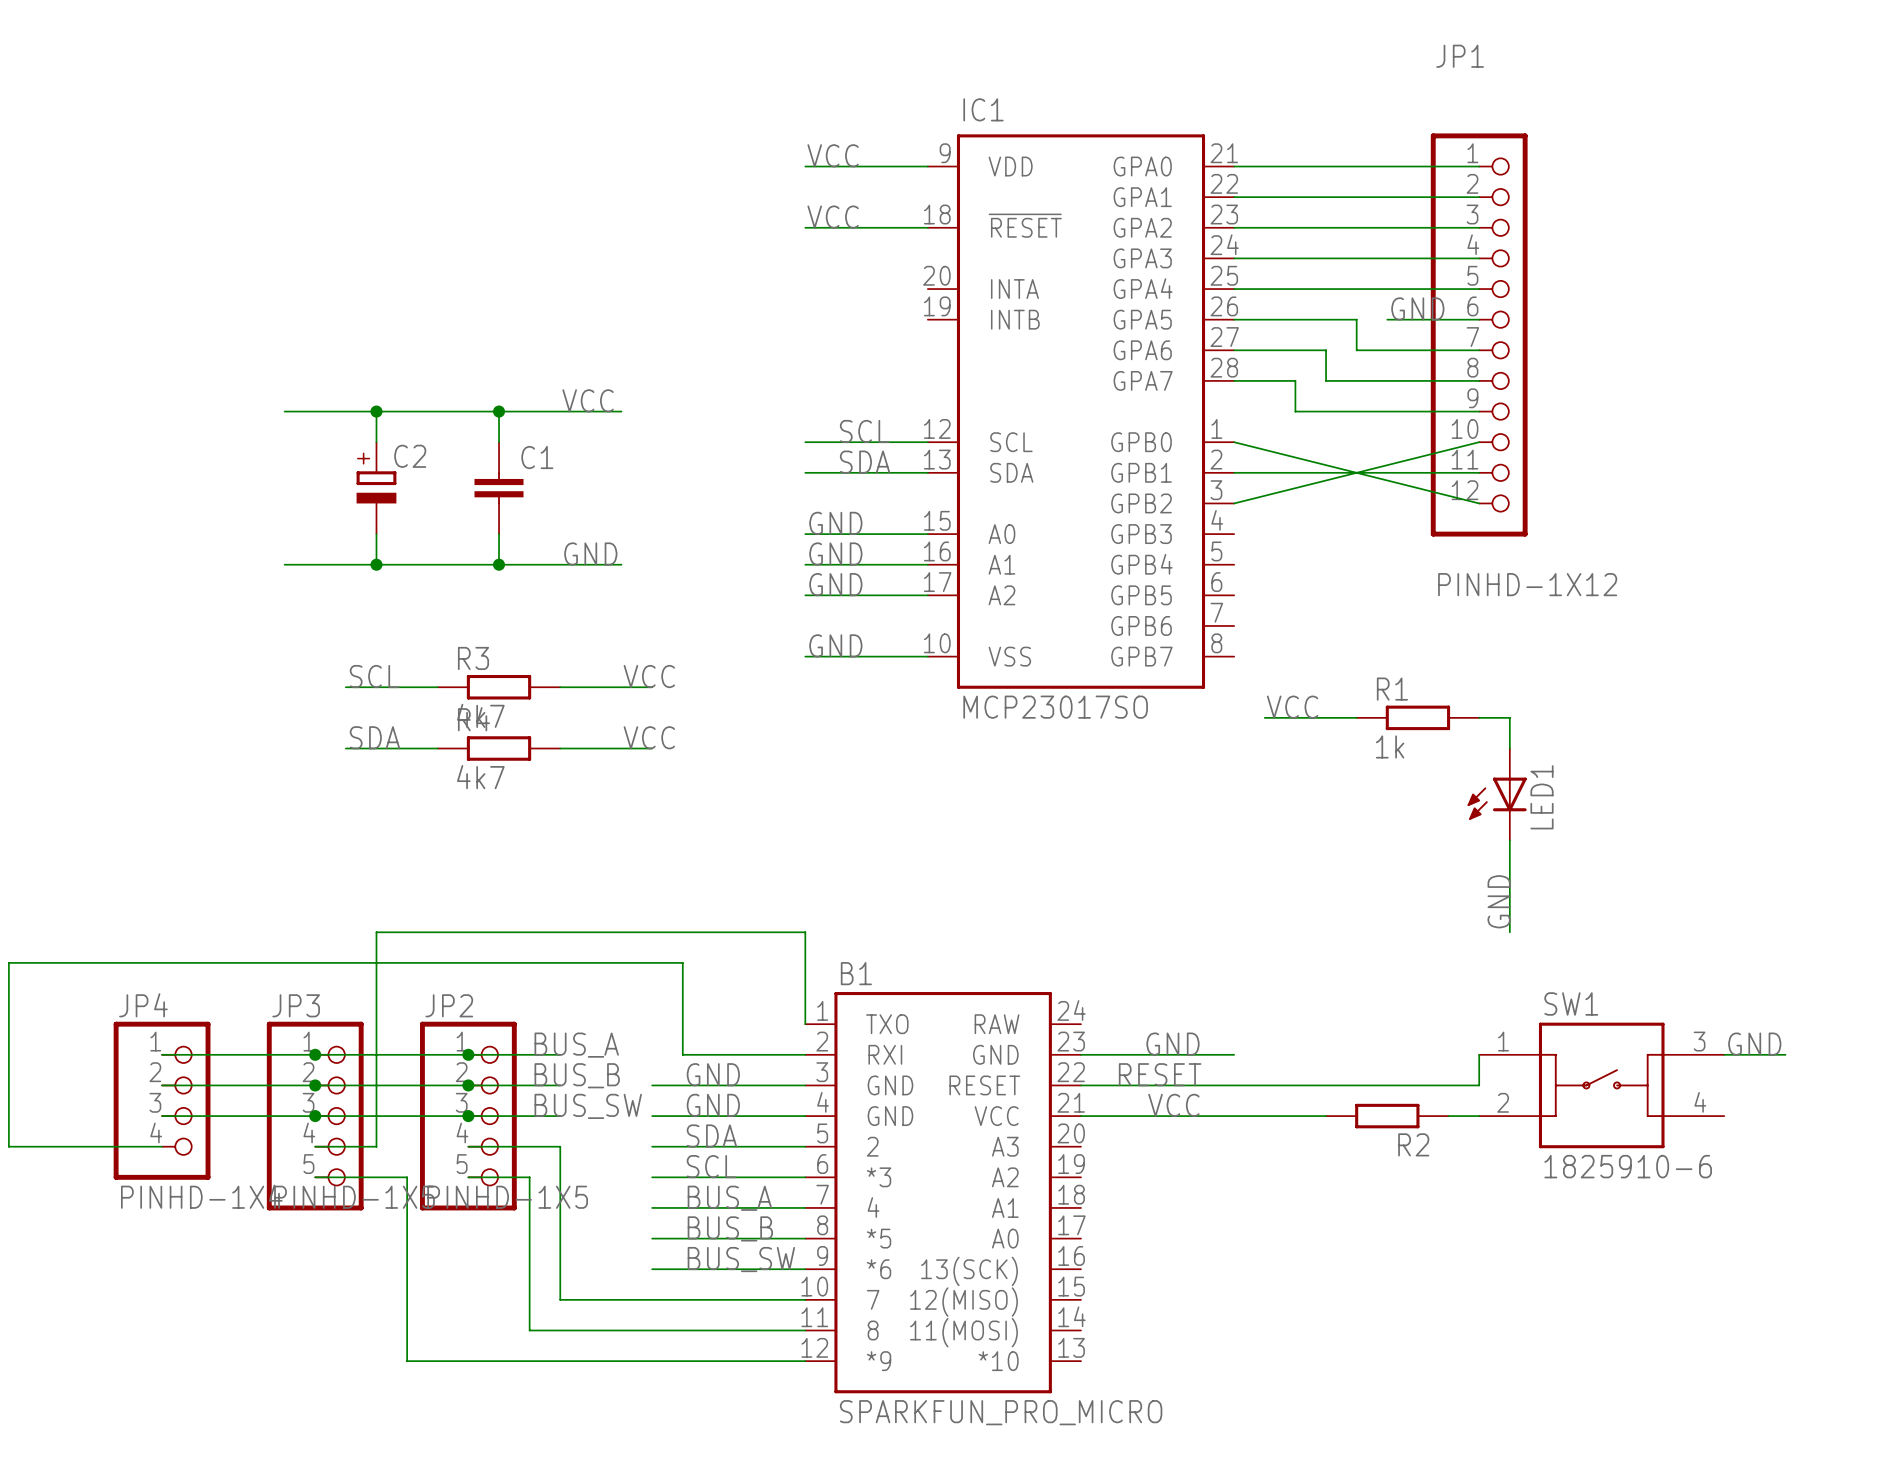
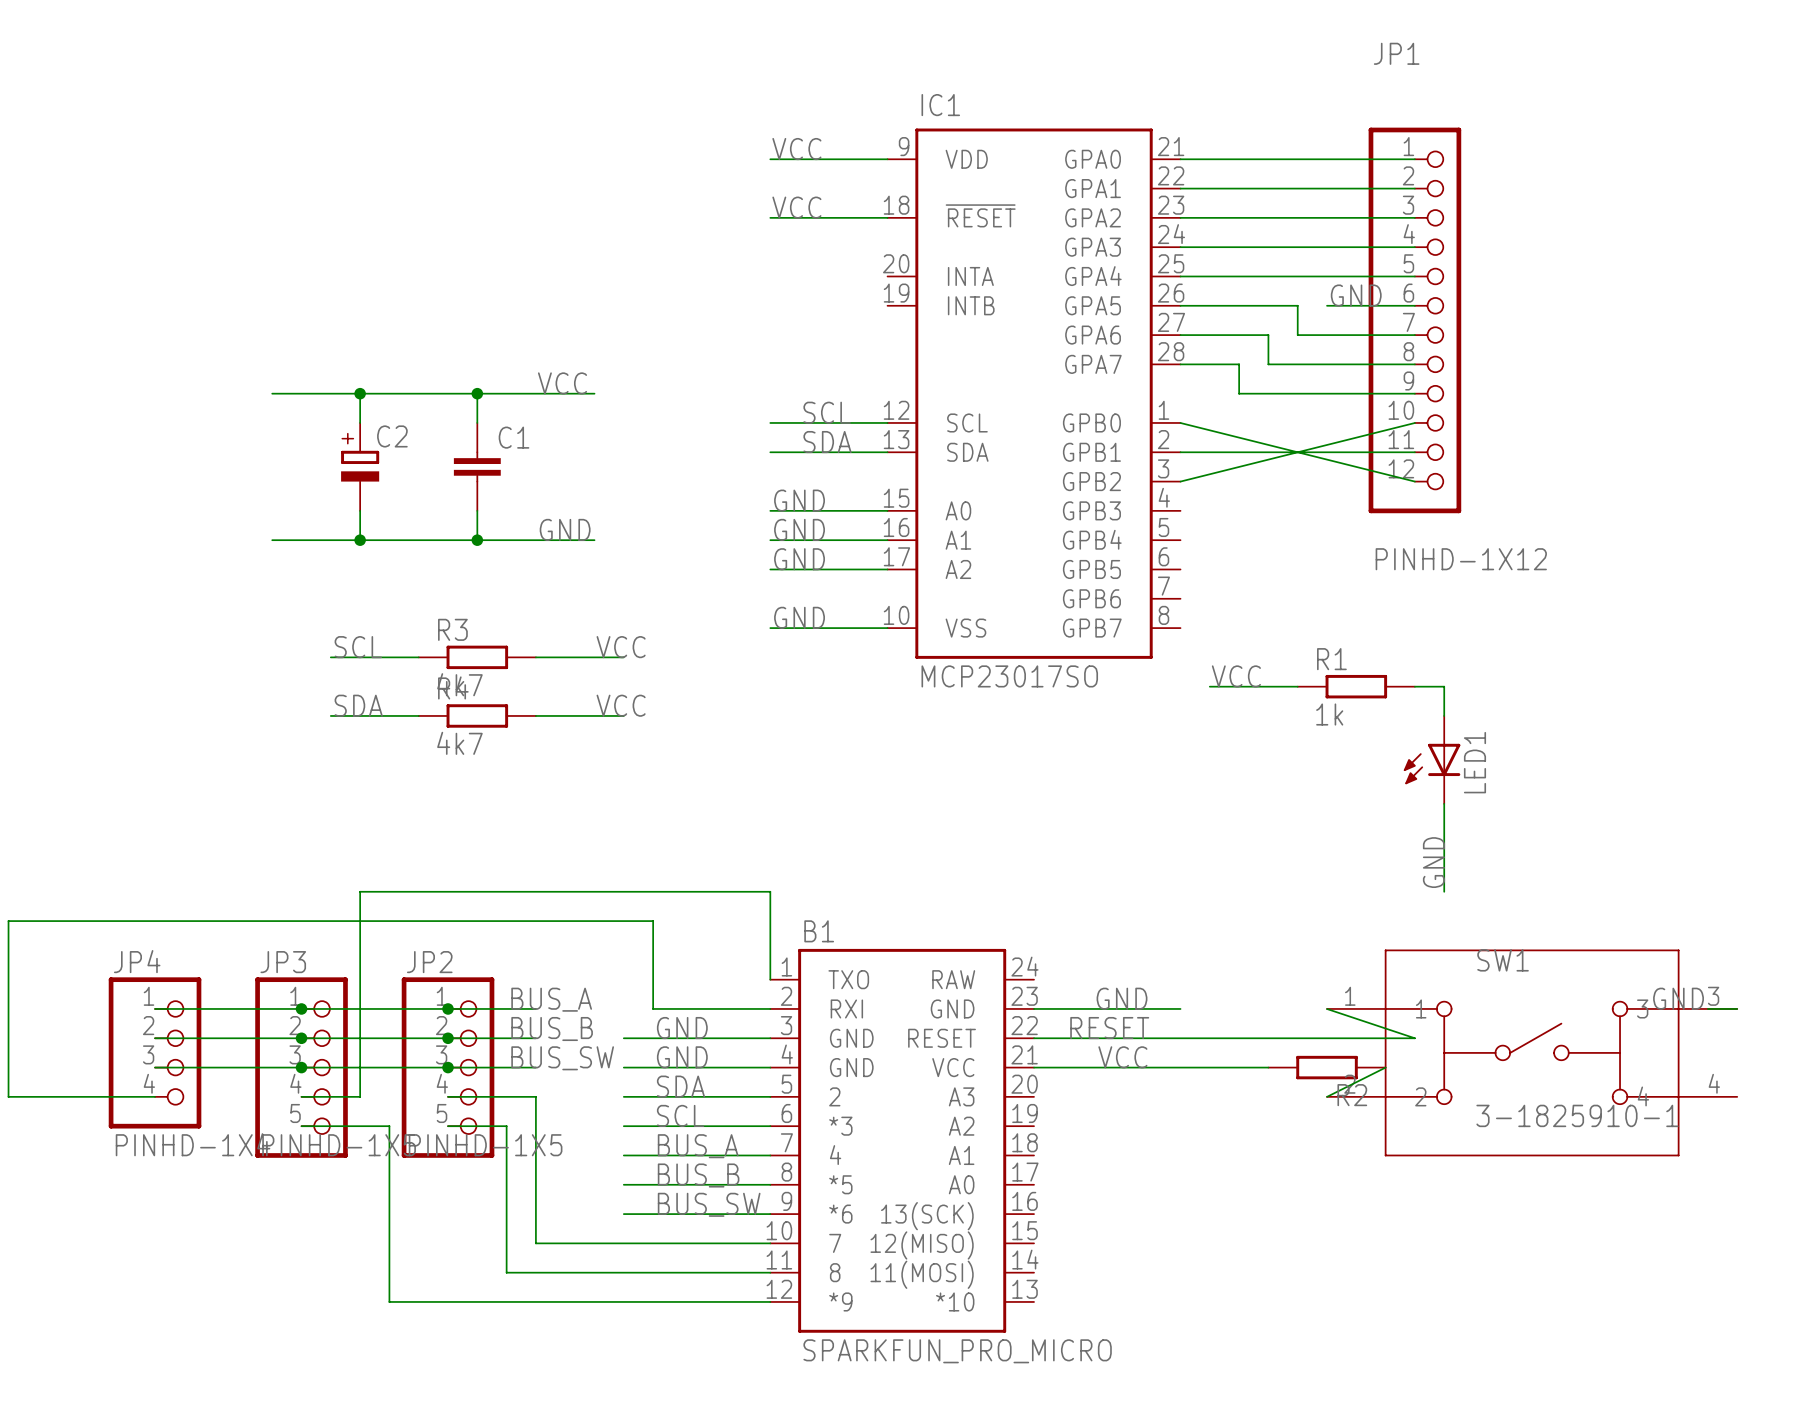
SW1 symbol: [1479, 1022, 1725, 1149] -> [1327, 949, 1738, 1157]
wire: (1479, 1054) (1479, 1085) -> (1327, 1008) (1414, 1038)
wire: (1448, 1116) (1479, 1116) -> (1385, 1067) (1327, 1096)
SW1 value: 1825910-6 (1628, 1166) -> 3-1825910-1 (1577, 1115)

